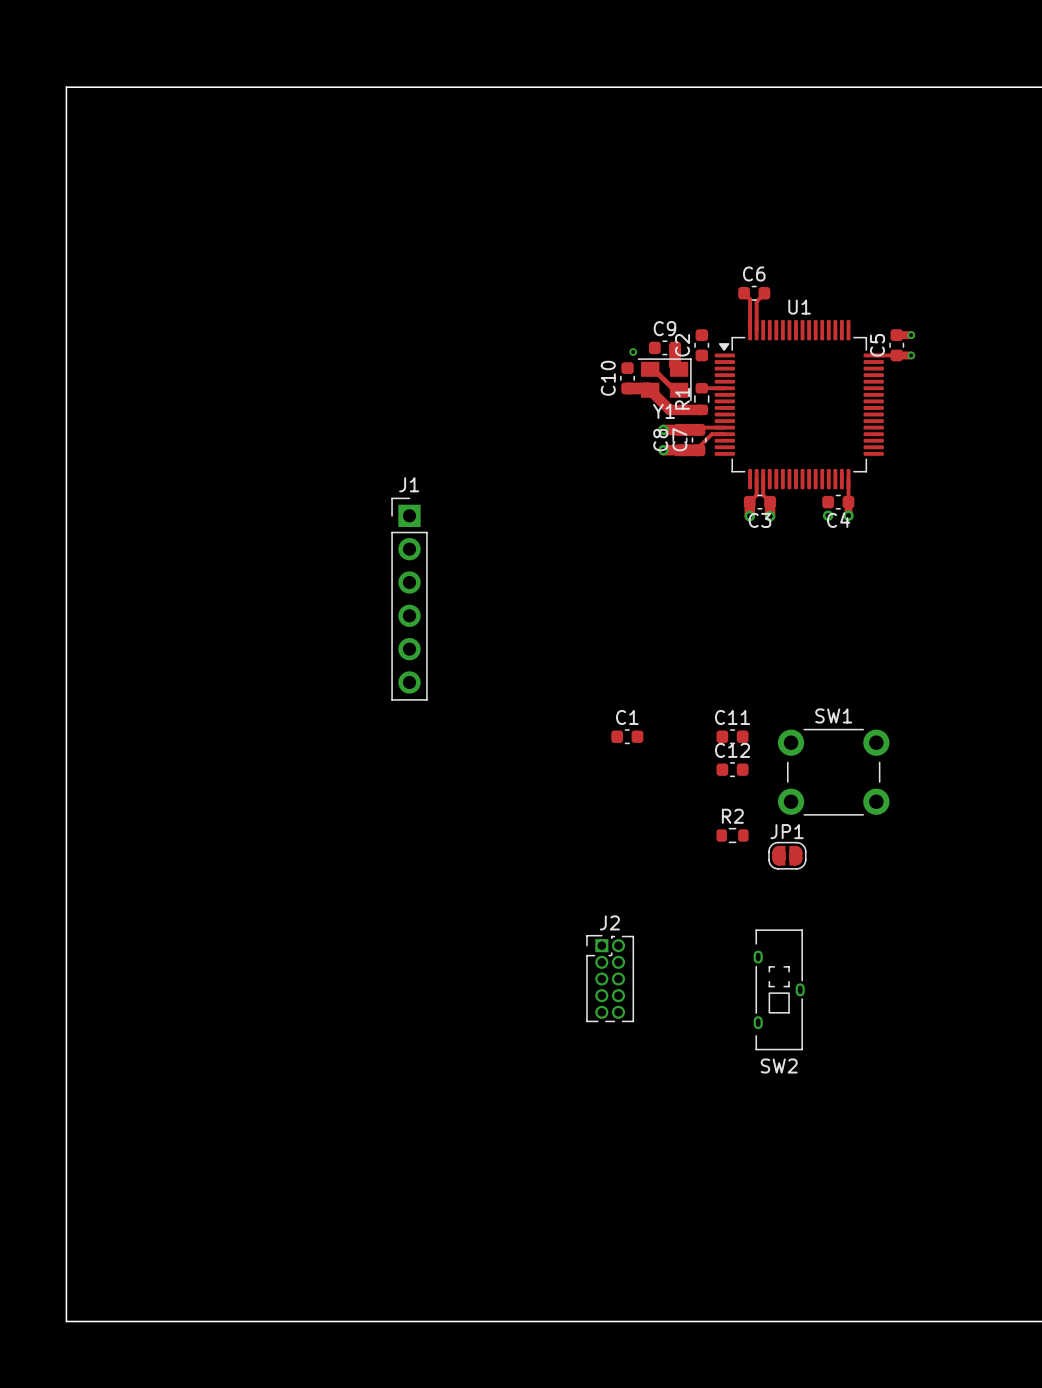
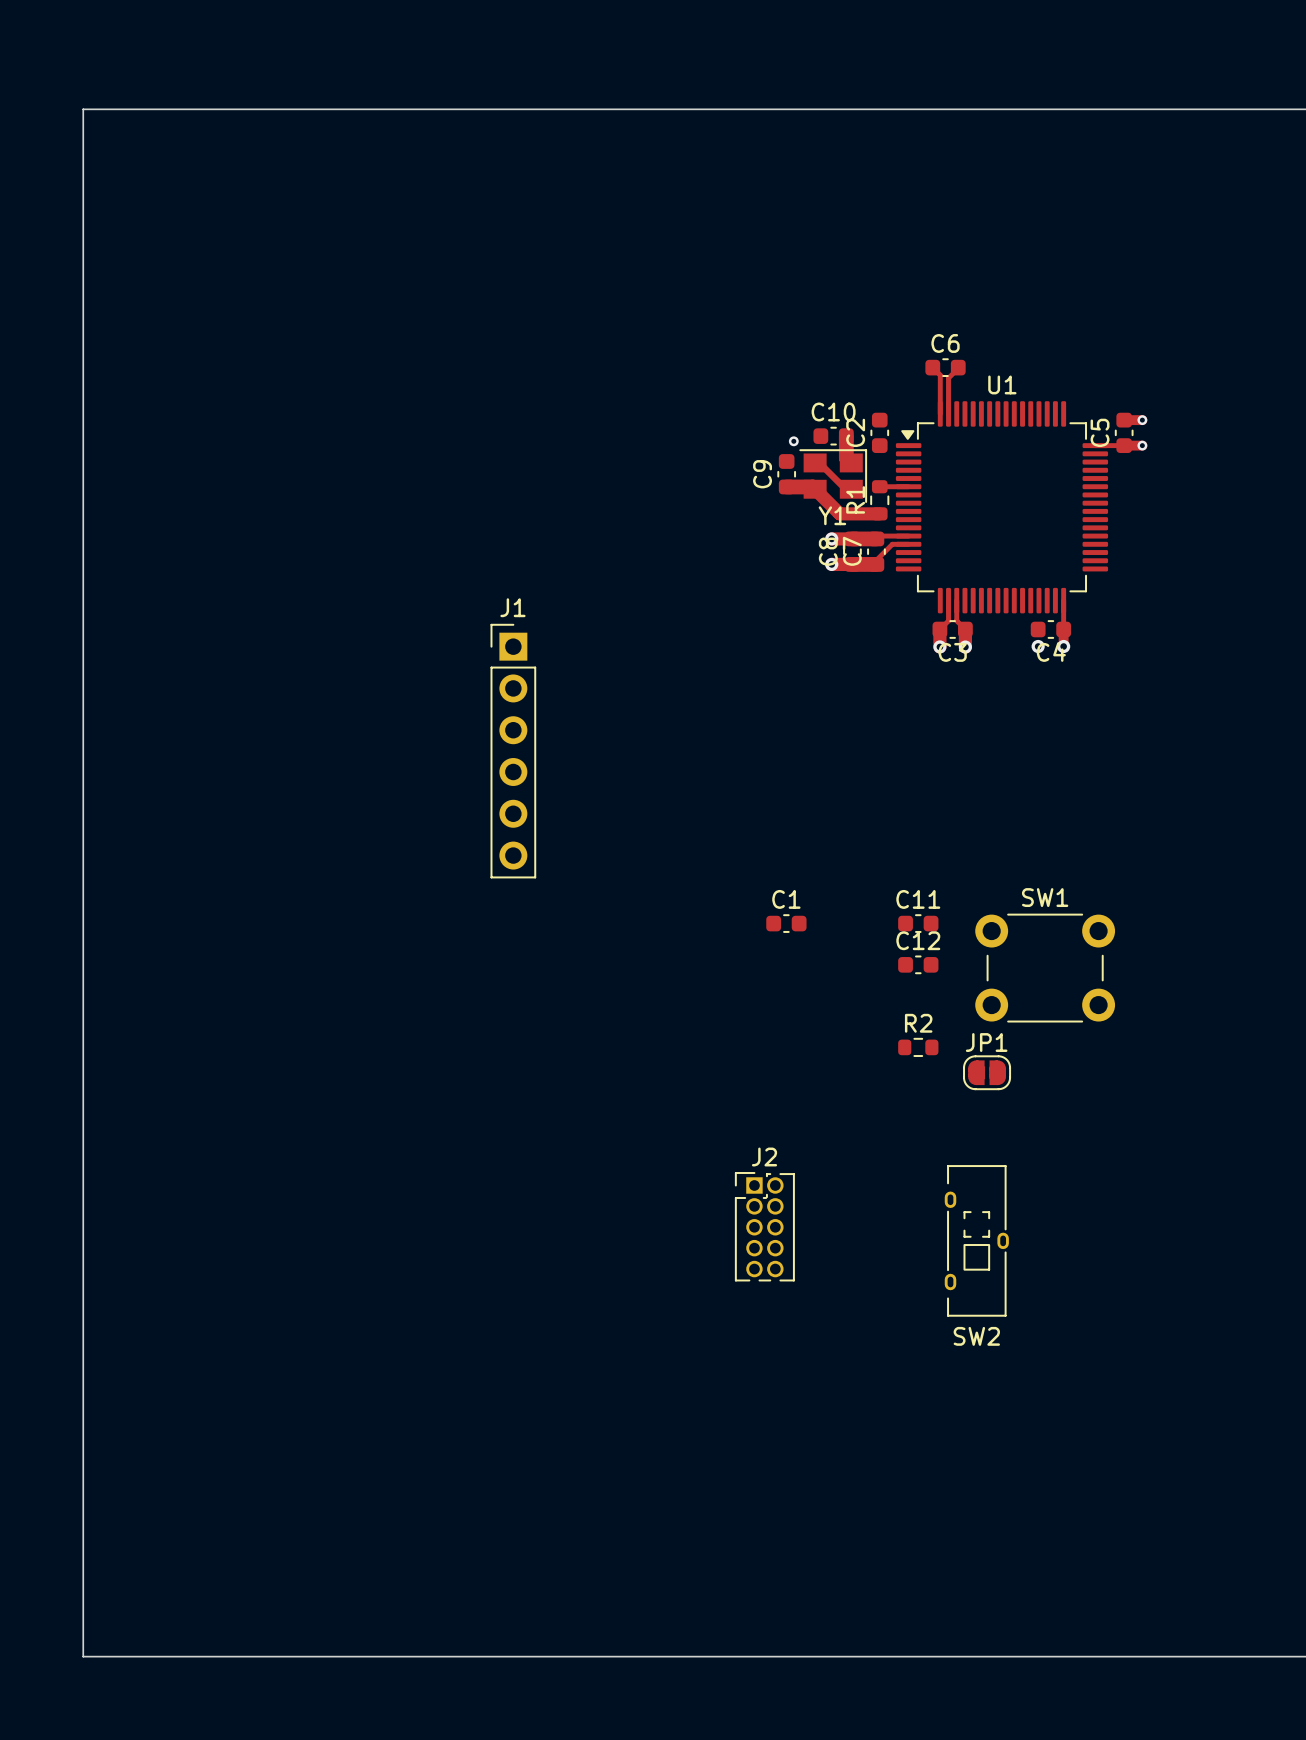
C9 name: C9 (664, 328) -> C10 (833, 411)
C10 name: C10 (608, 378) -> C9 (762, 474)

